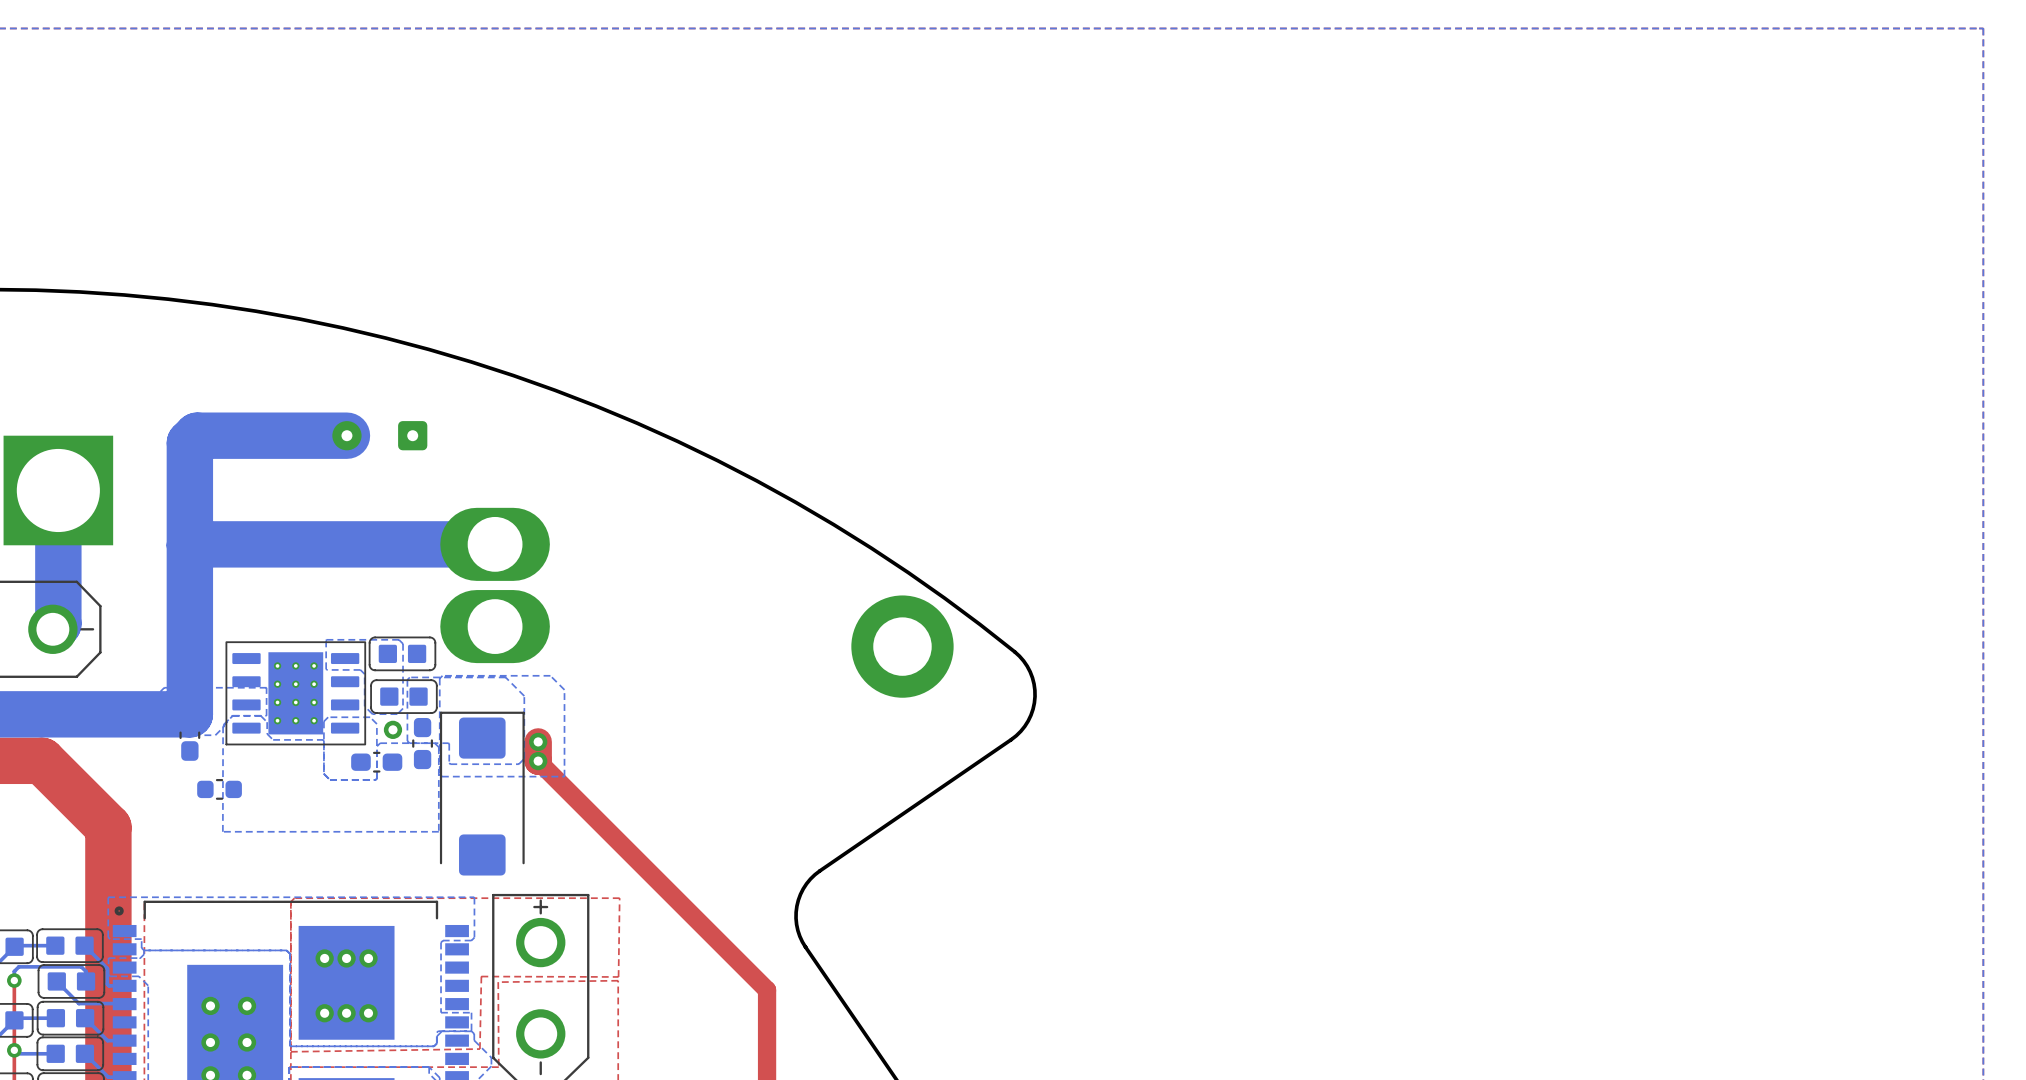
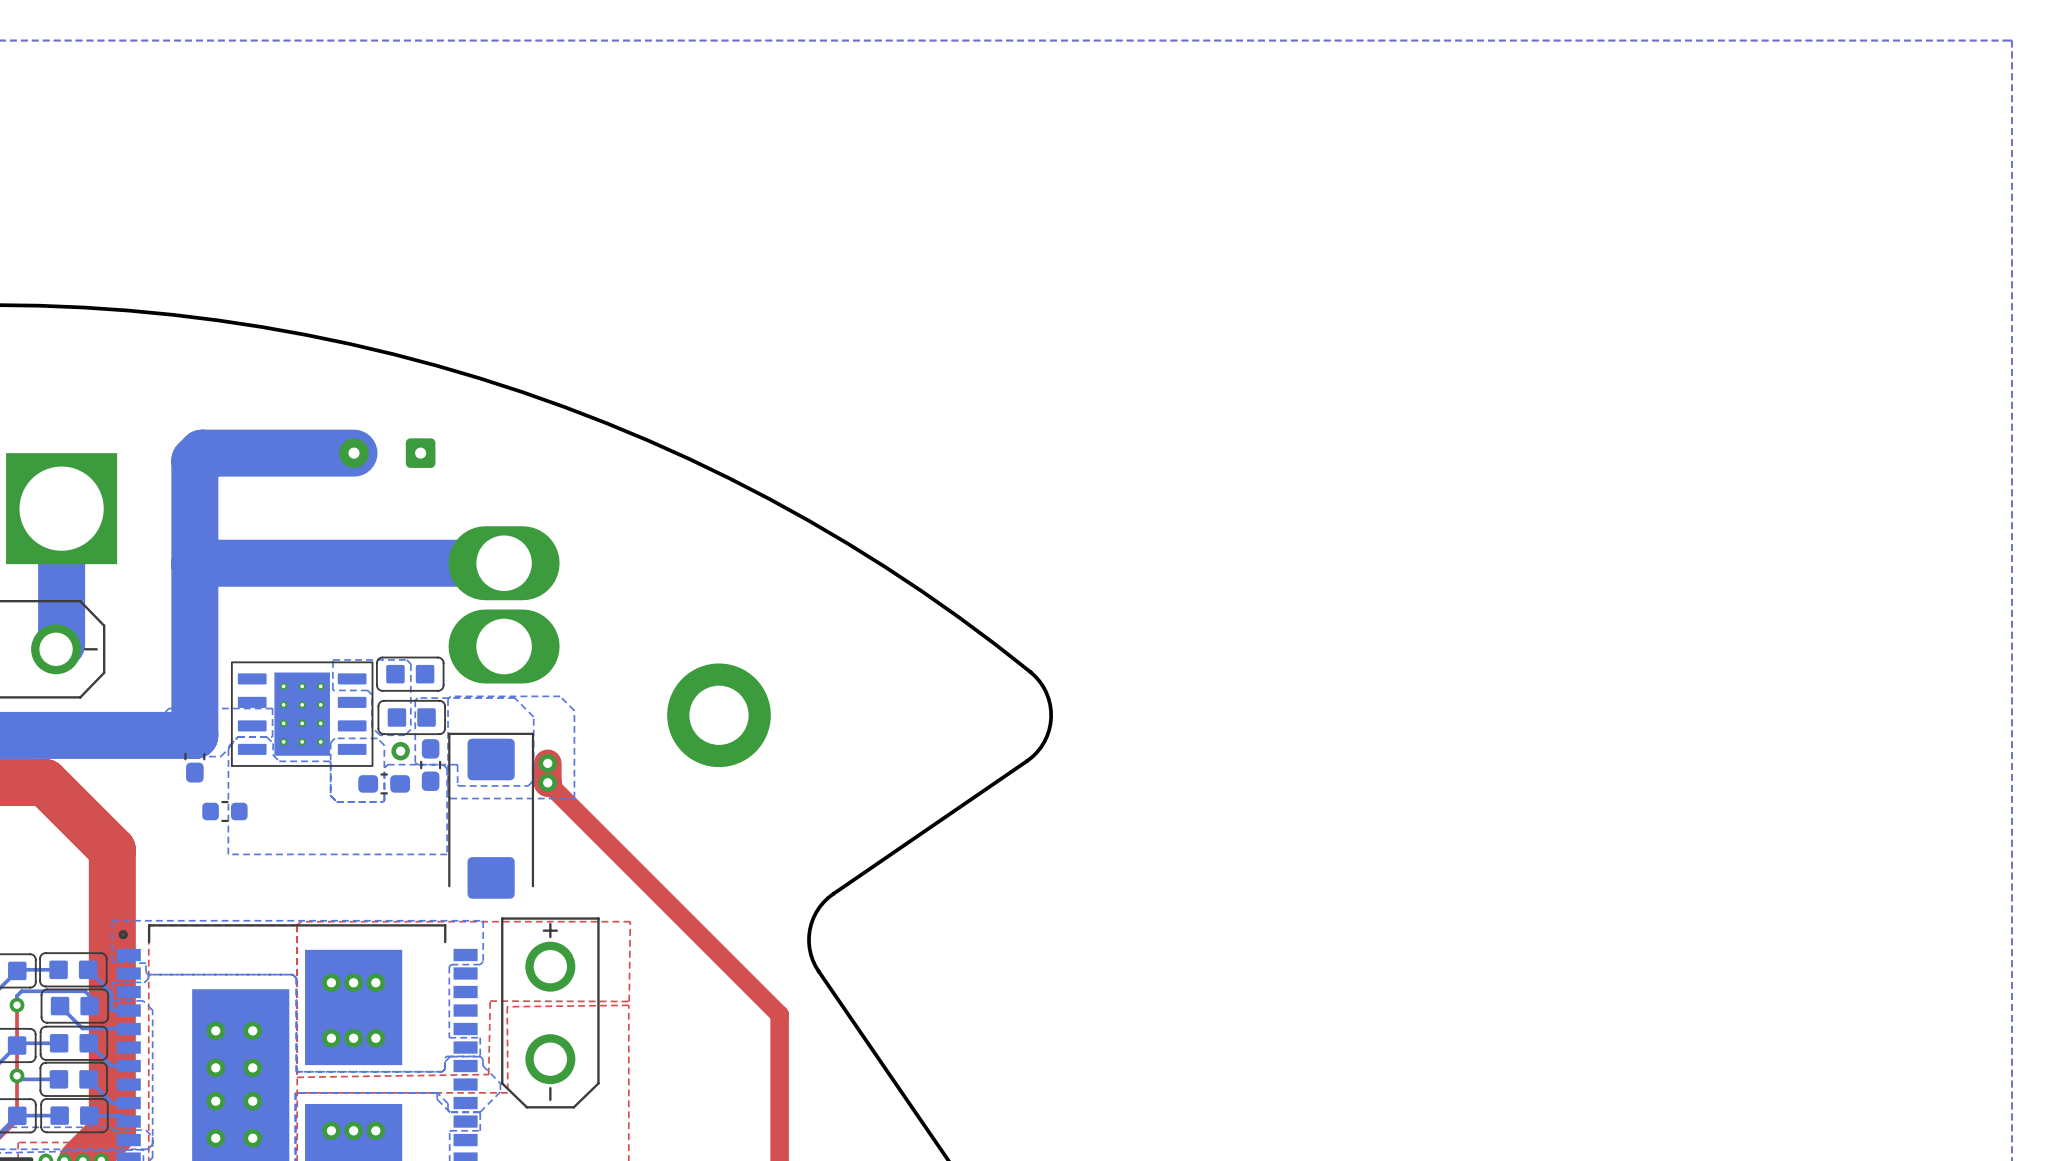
part position: (902, 646) -> (718, 715)

